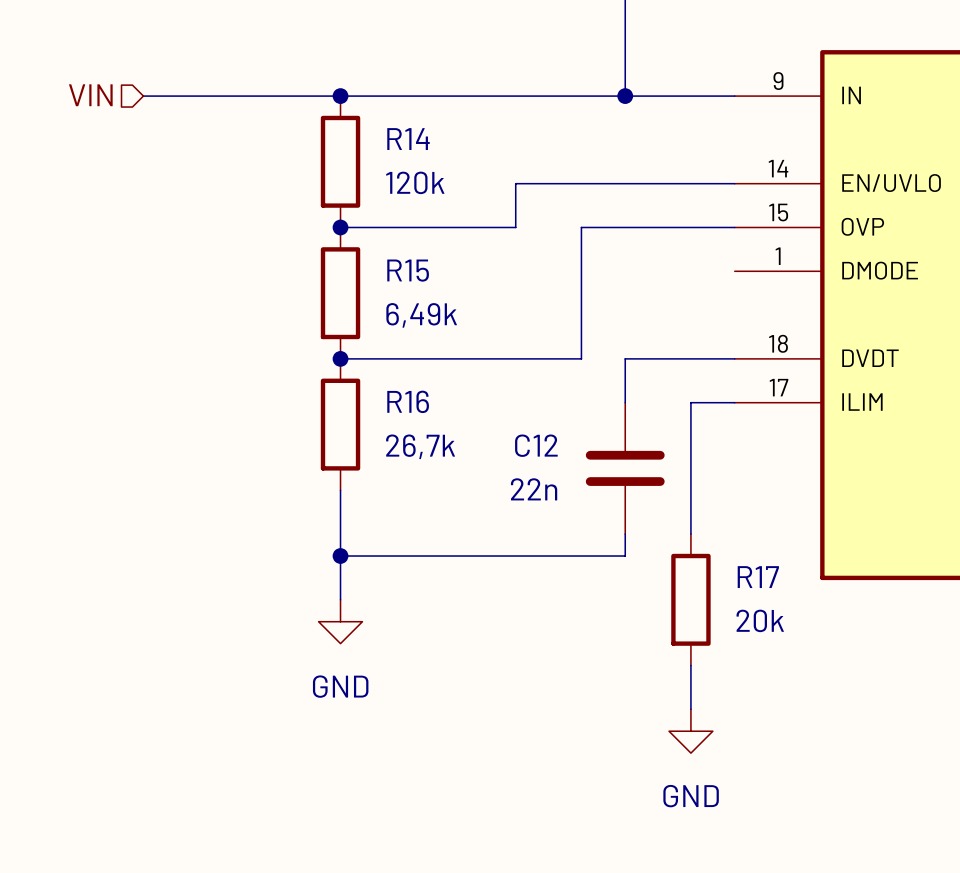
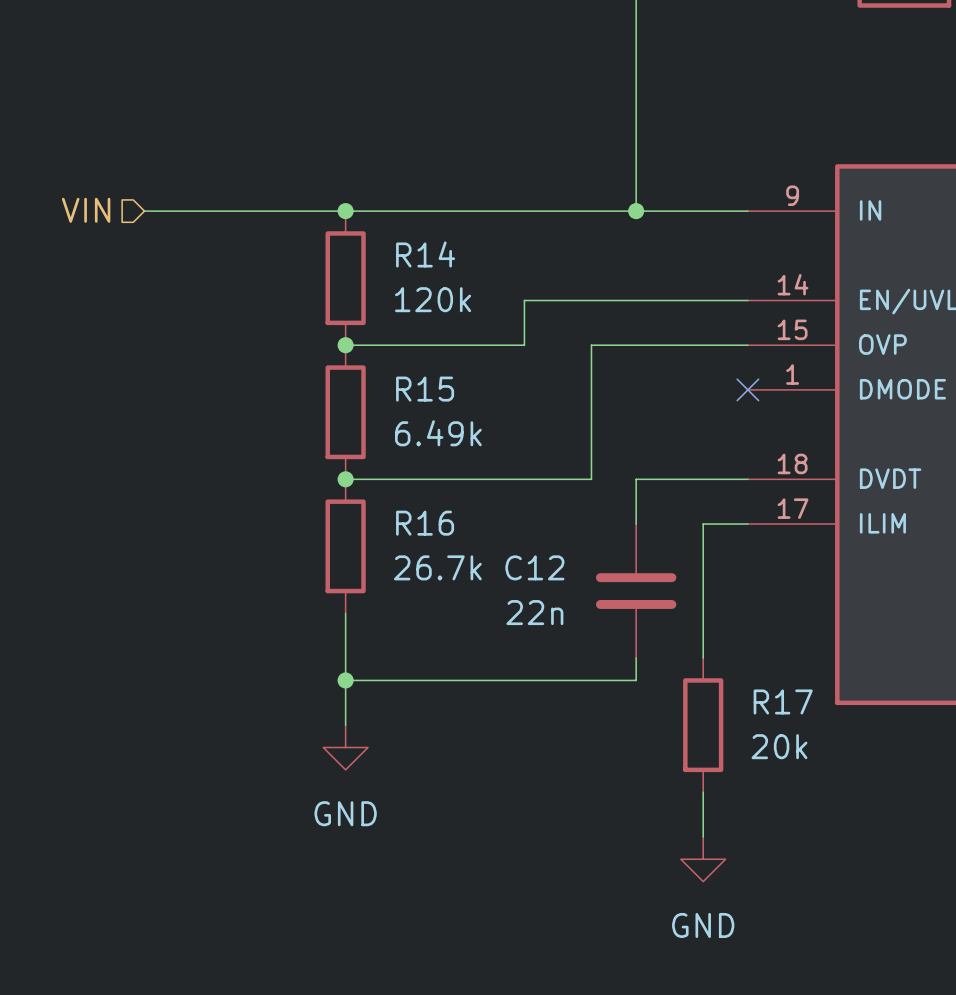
no-connect mark: none -> (747, 389)
R15 value: 6,49k (421, 315) -> 6.49k (438, 433)
R16 value: 26,7k (420, 446) -> 26.7k (437, 567)

